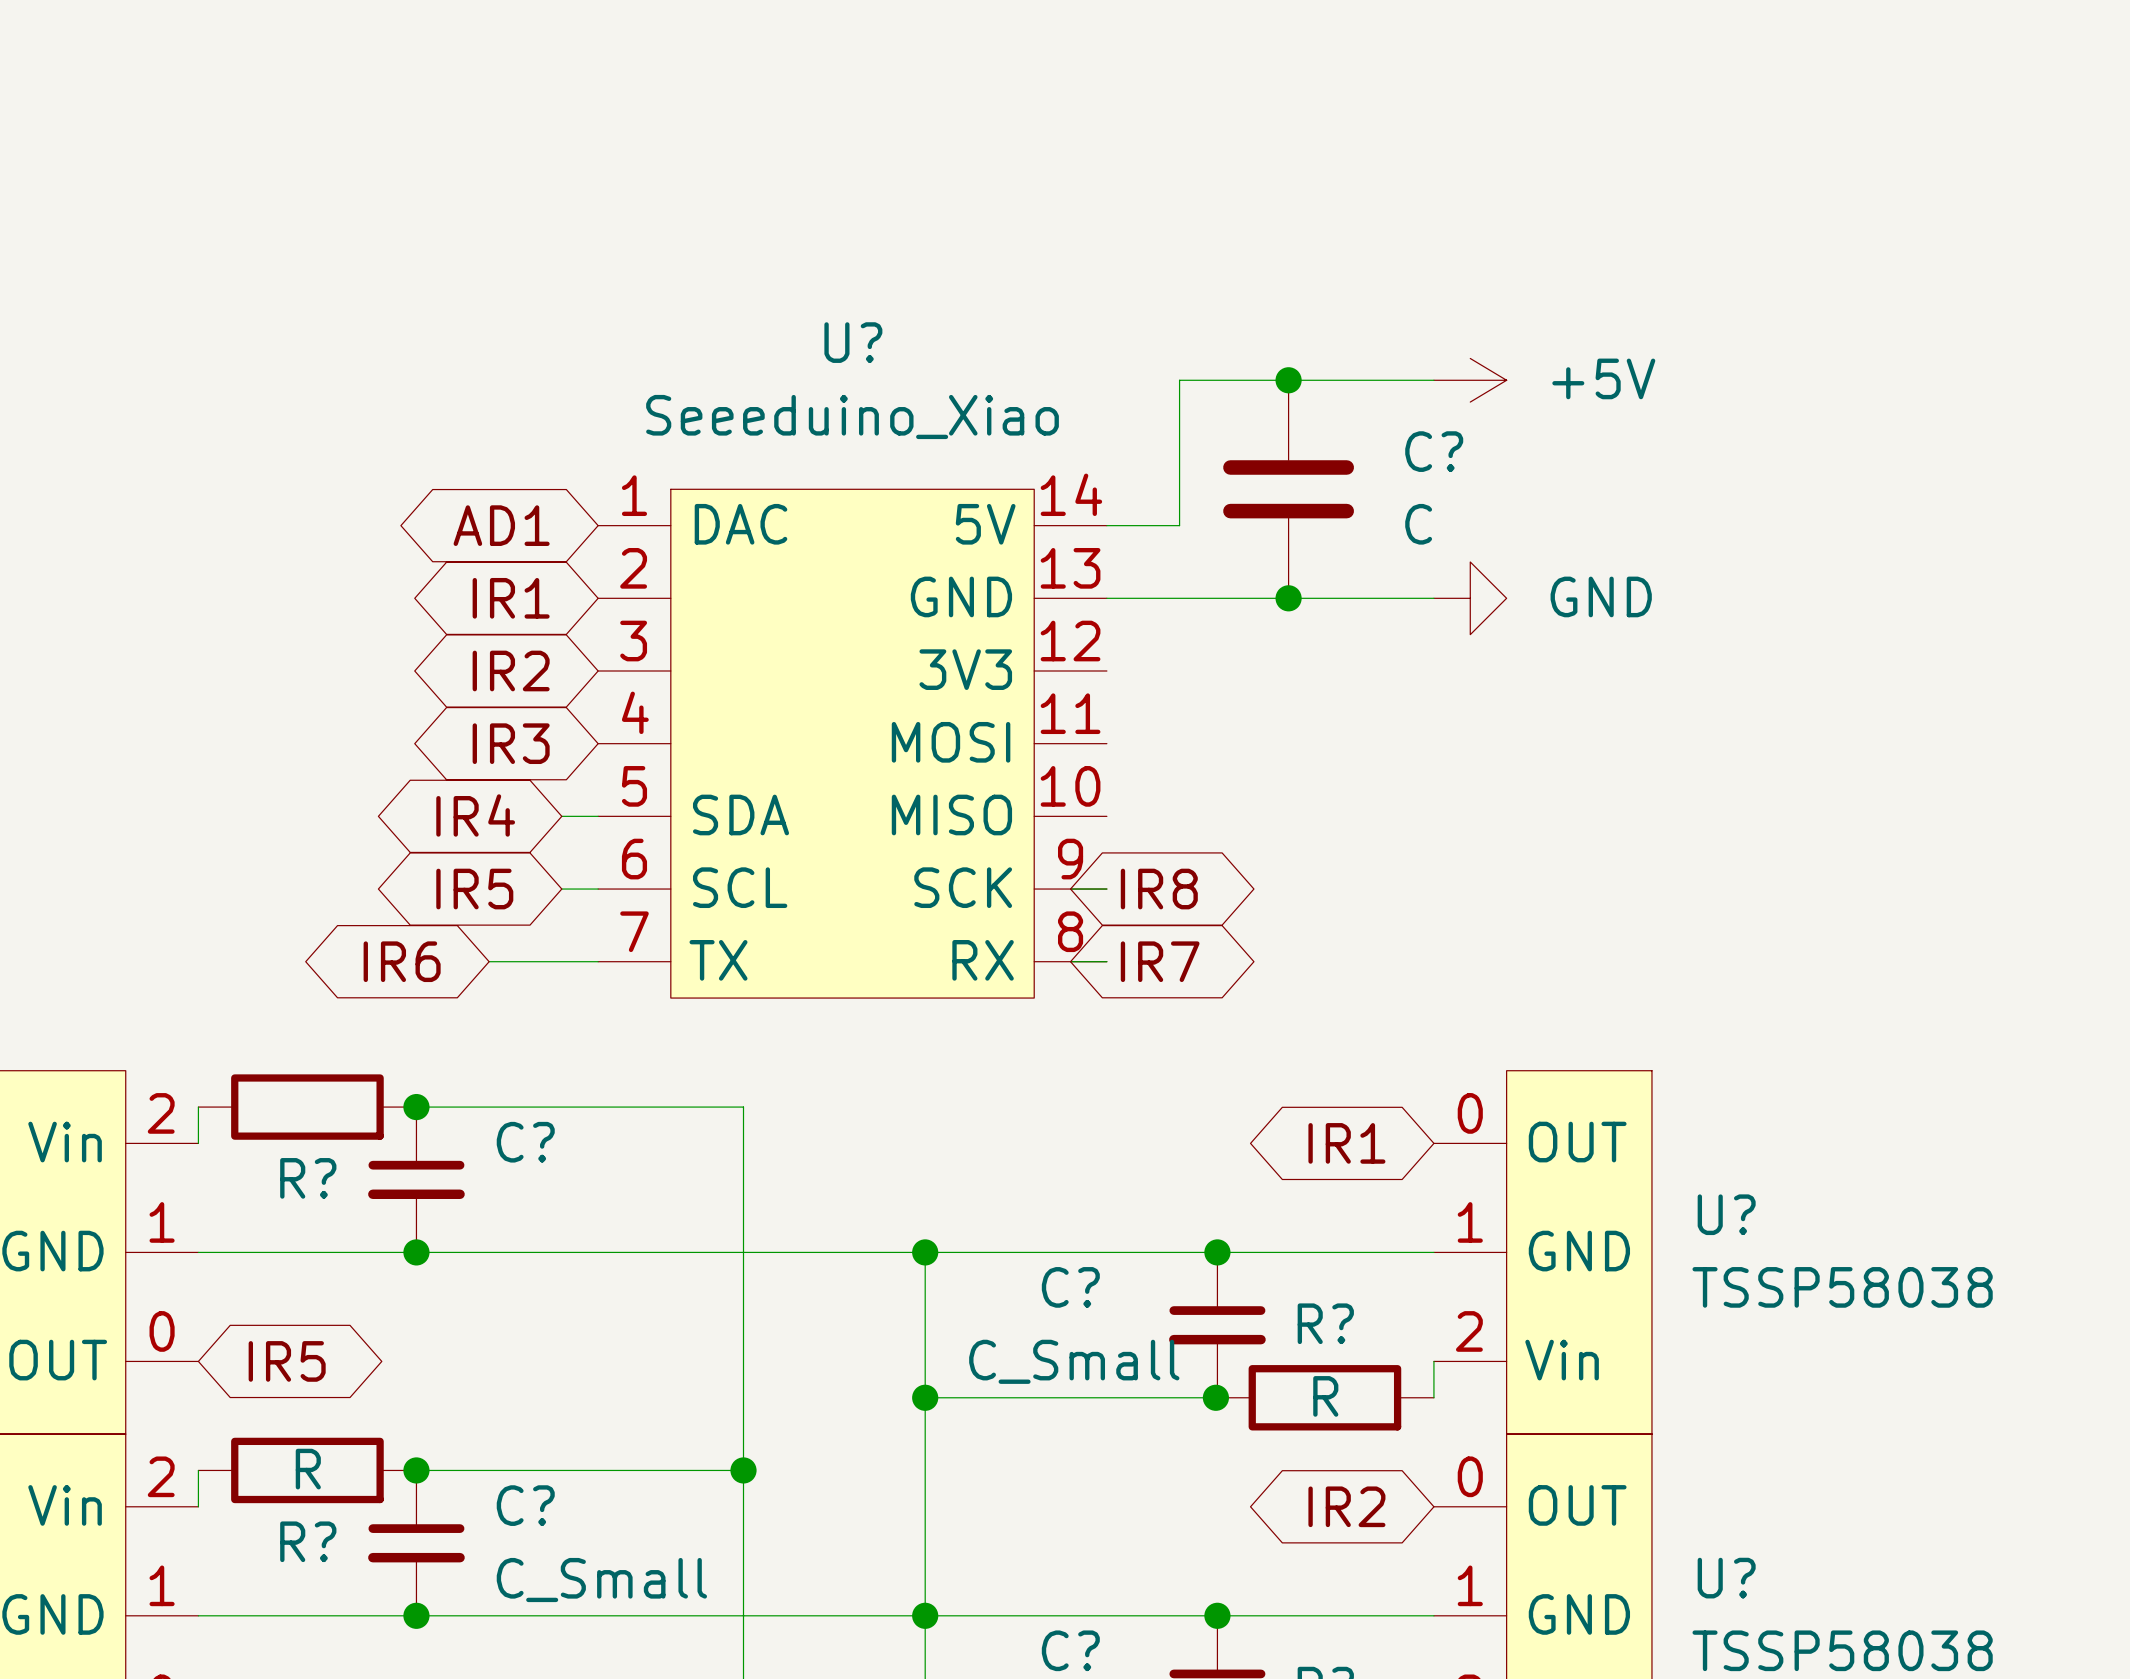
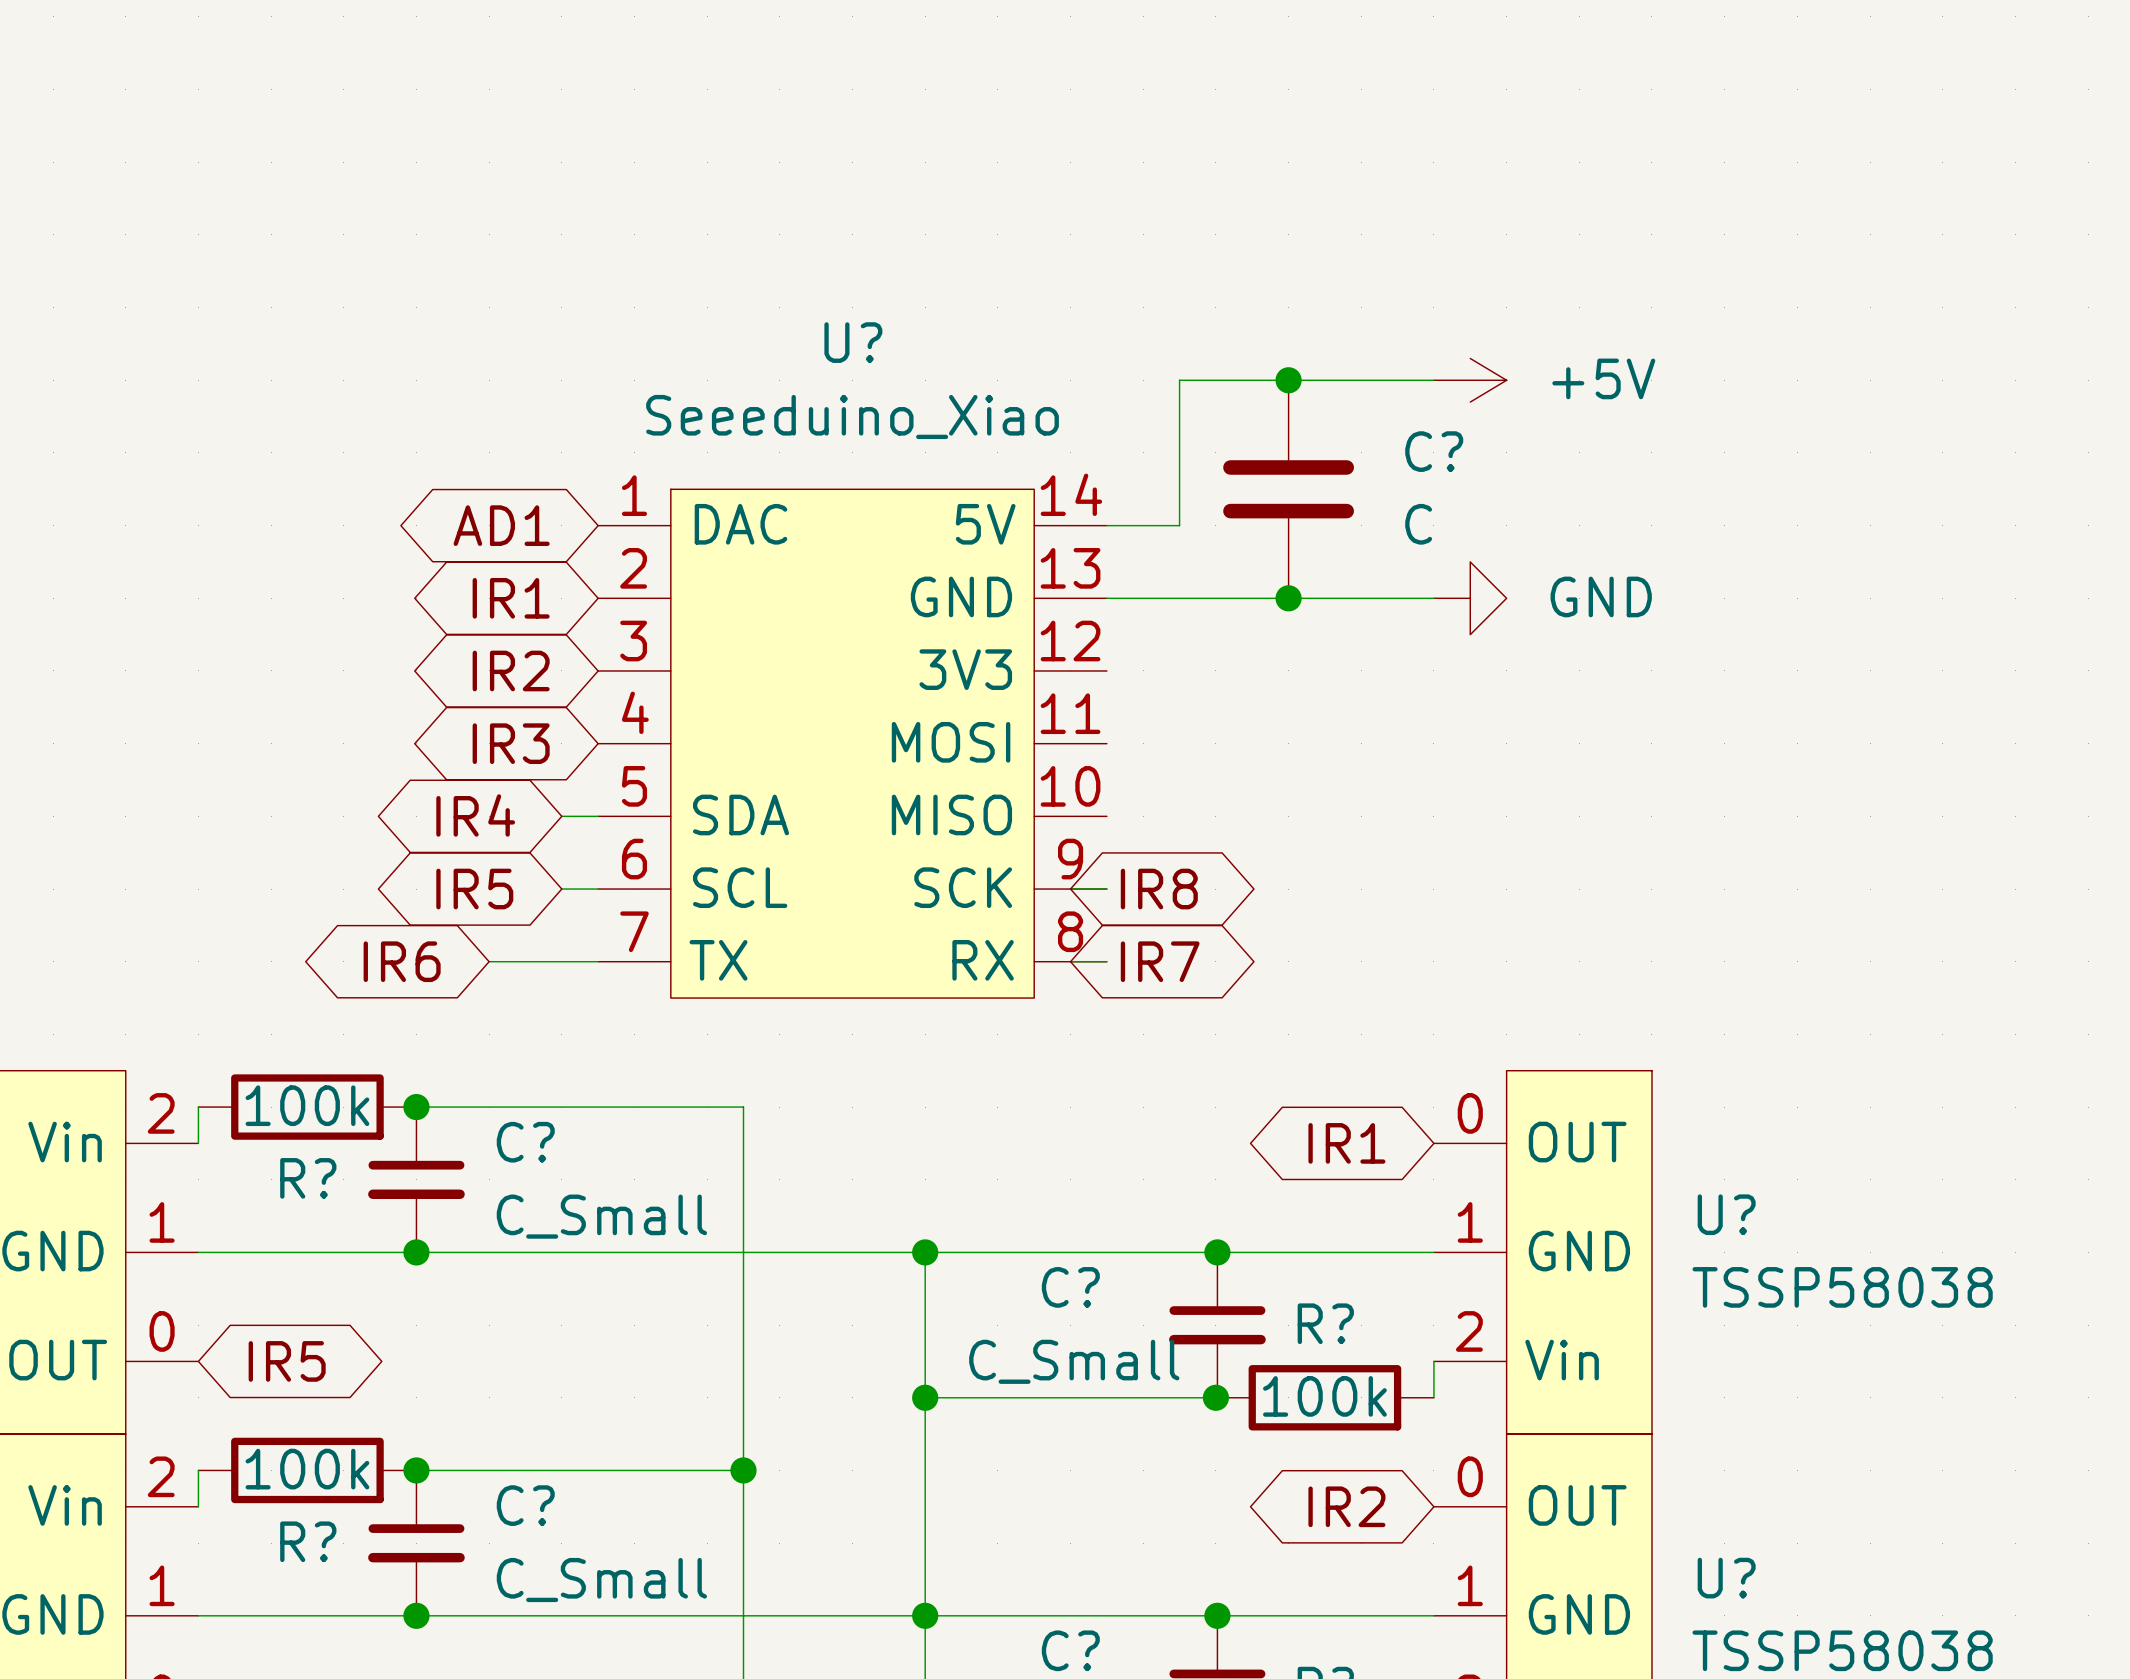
R? value: none -> 100k (307, 1105)
C? value: none -> C_Small (601, 1216)
R? value: R (1325, 1396) -> 100k (1324, 1396)
R? value: R (308, 1469) -> 100k (307, 1469)

